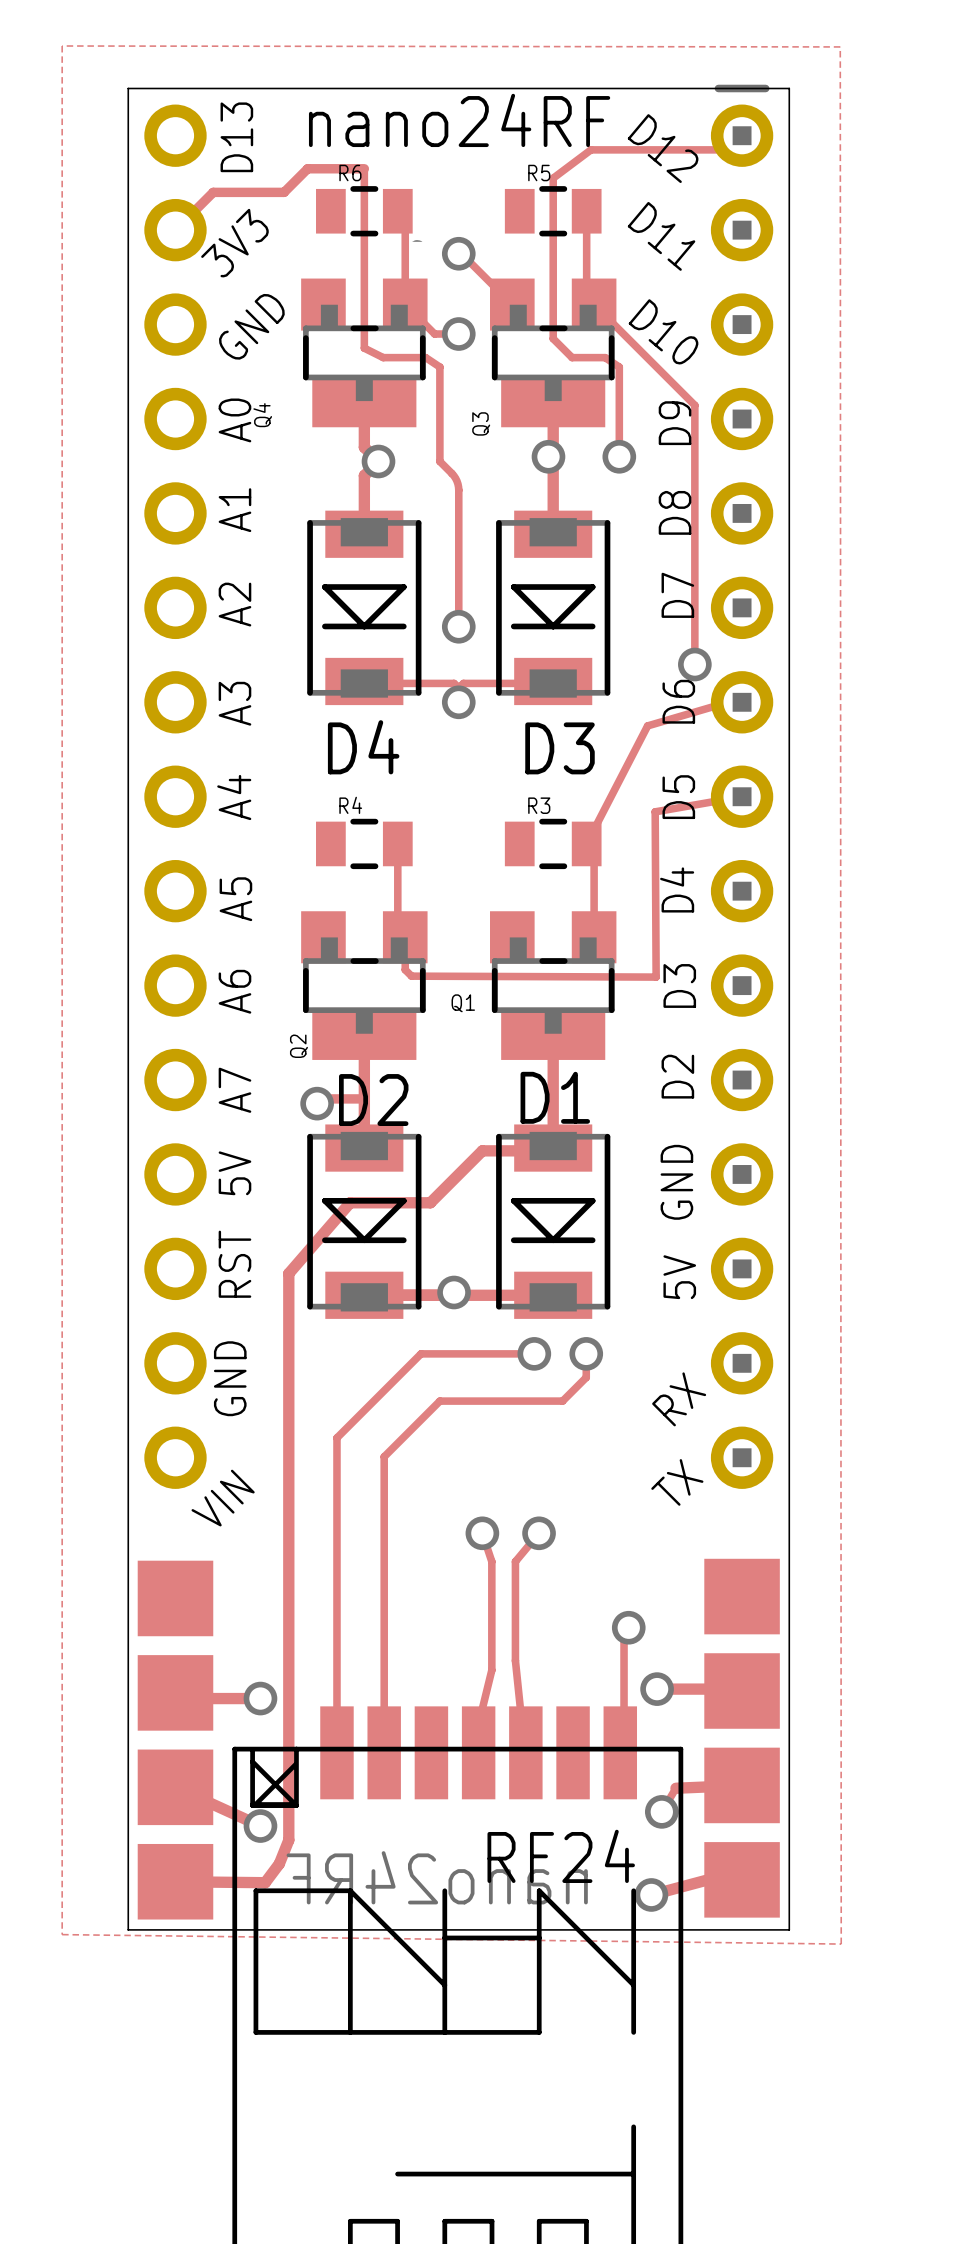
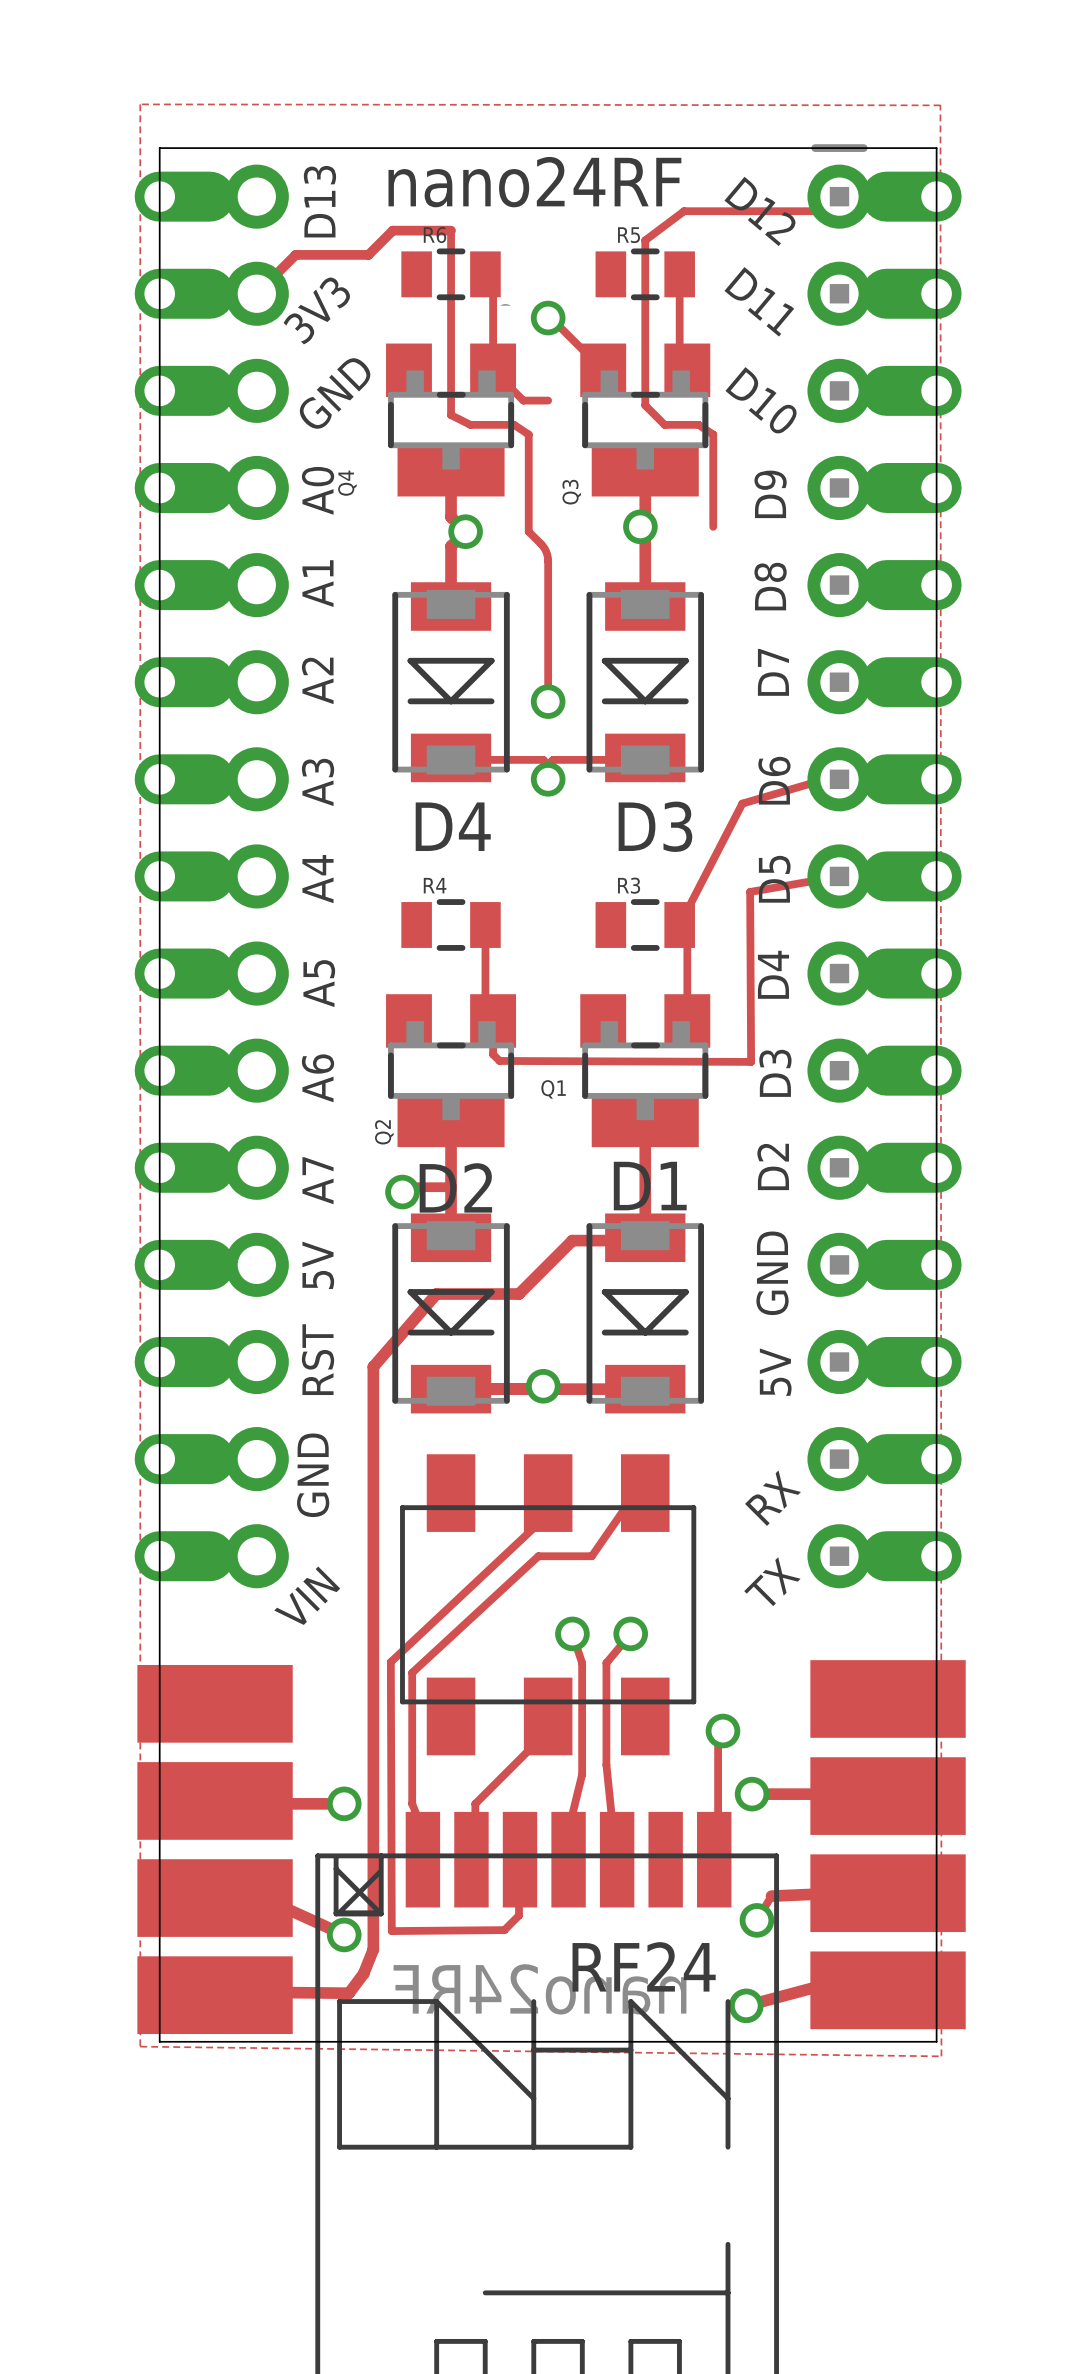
board edge: (128, 88) (128, 1929) -> (208, 148) (159, 148) (159, 2041) (208, 2041)
board edge: (789, 88) (789, 1929) -> (888, 148) (936, 148) (936, 2041) (888, 2041)
track: (594, 304) (694, 405) (694, 664) -> none
via: (458, 334) -> none
via: (619, 456) -> none
via: (694, 664) -> none
part: none -> (184, 876)
part: none -> (911, 876)
track: (534, 1353) (421, 1353) (336, 1437) (336, 1752) -> (645, 1493) (635, 1493) (591, 1556) (538, 1556) (412, 1672) (412, 1803) (421, 1828) (422, 1859)
via: (534, 1353) -> none
track: (586, 1353) (586, 1377) (562, 1401) (439, 1401) (384, 1456) (384, 1752) -> (548, 1716) (548, 1731) (475, 1803) (475, 1855) (471, 1859)
via: (586, 1353) -> none
track: none -> (548, 1493) (547, 1515) (390, 1662) (391, 1931) (504, 1930) (519, 1915) (520, 1859)
part: none -> (548, 1604)
part: (742, 1738) -> none
part: none -> (888, 1844)
part: (175, 1740) -> none
part: none -> (215, 1849)

